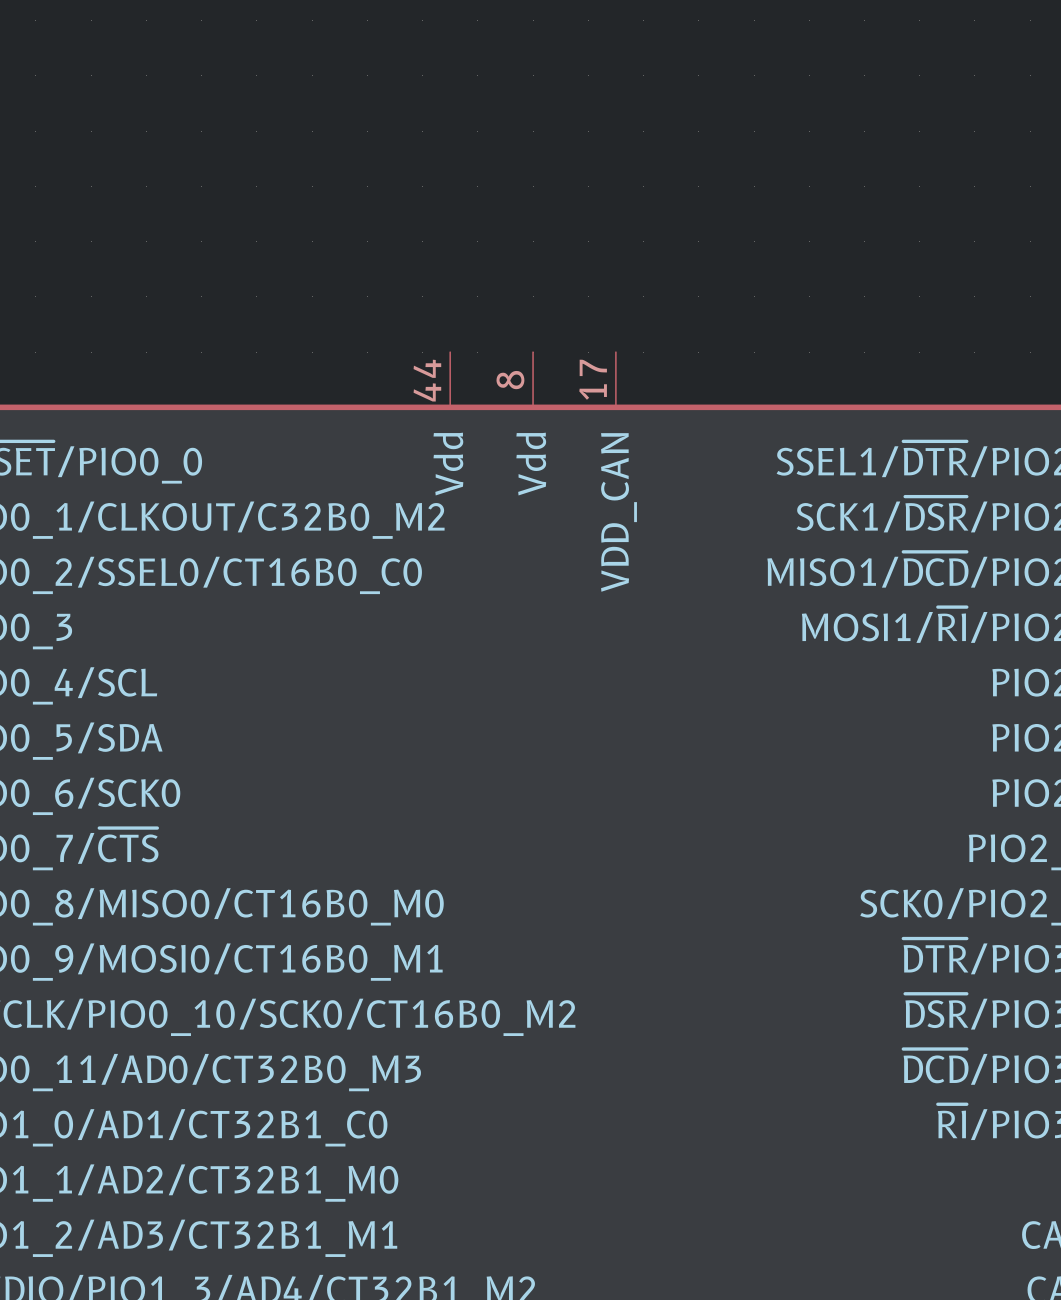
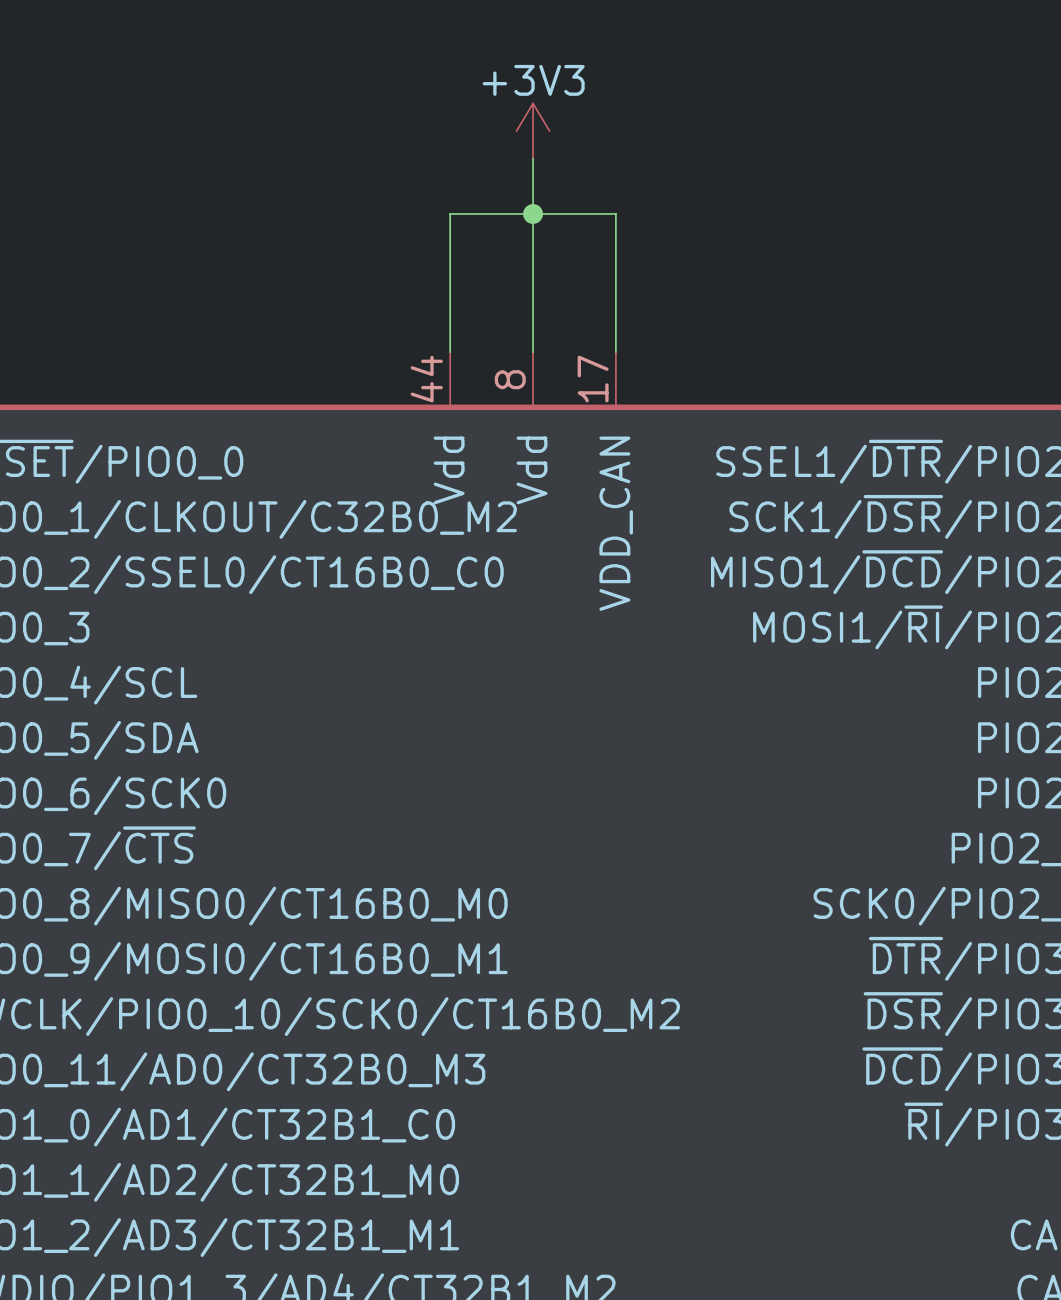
power symbol: none -> +3V3 (533, 131)
wire: none -> (533, 158) (533, 352)
junction: none -> (533, 213)
wire: none -> (450, 352) (450, 213) (615, 213) (615, 352)

